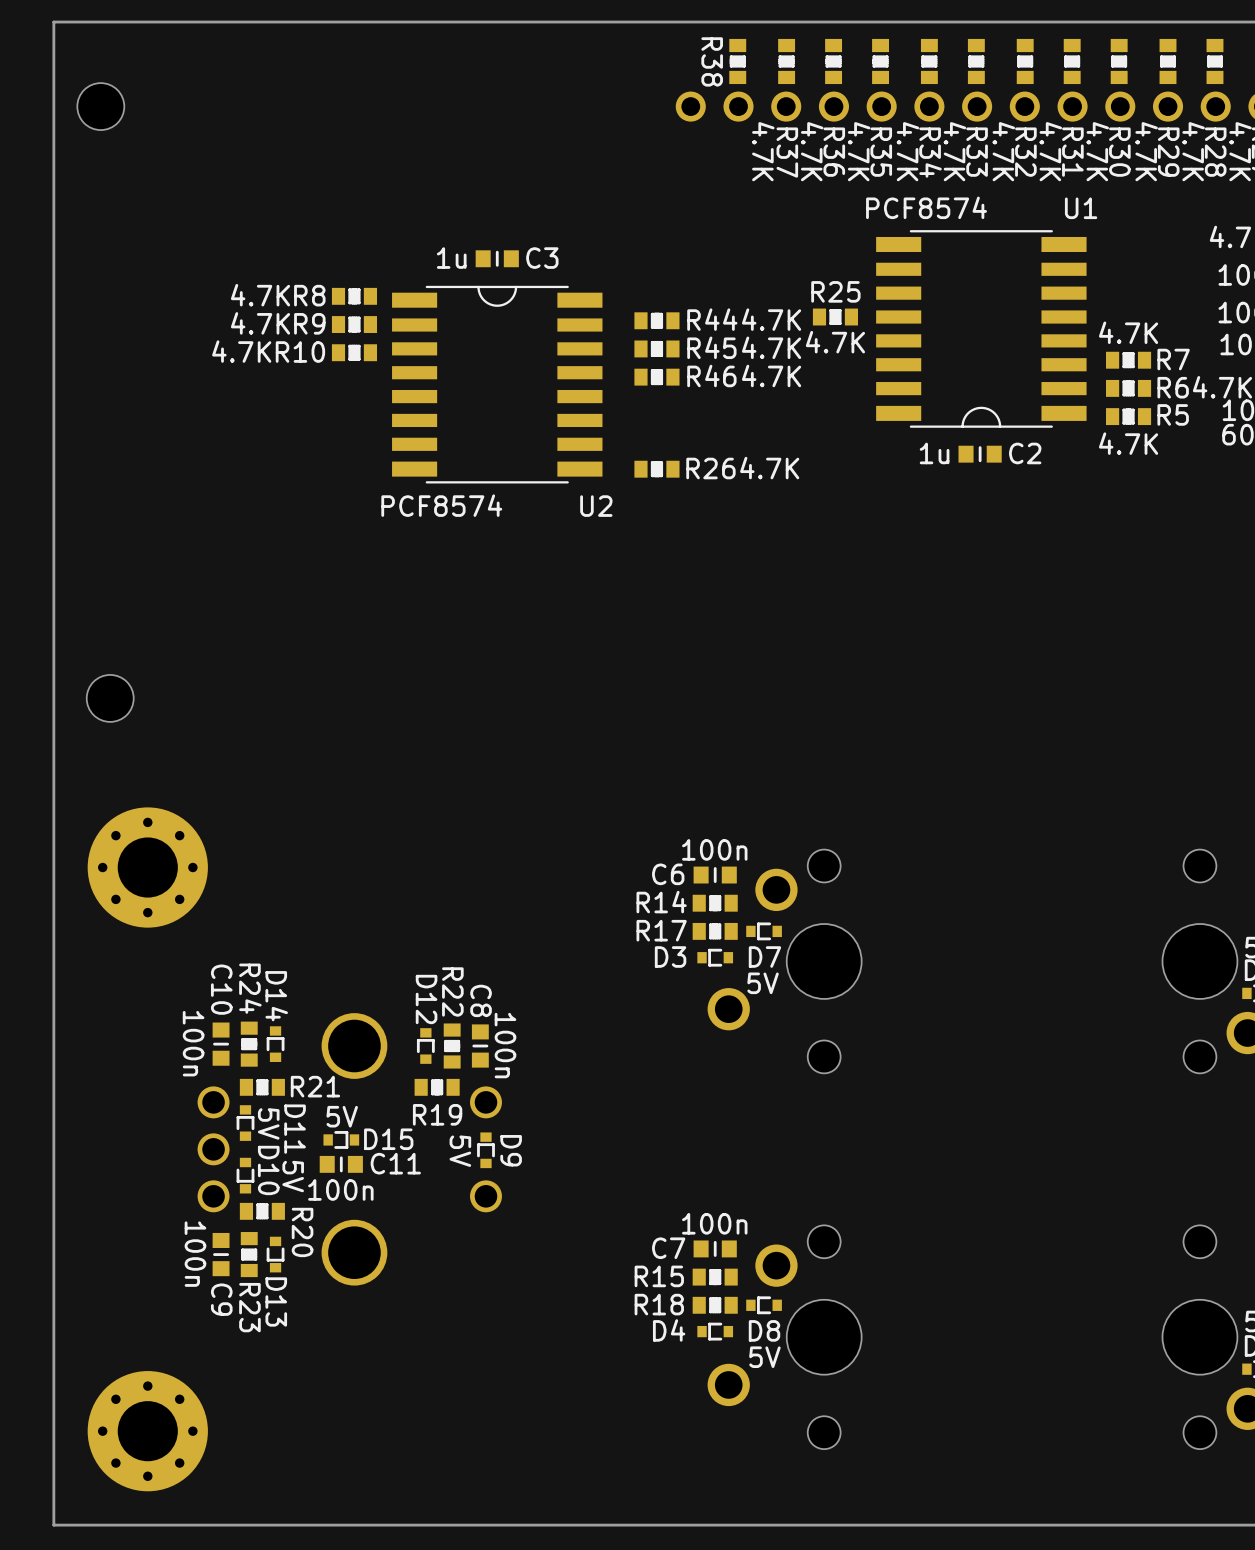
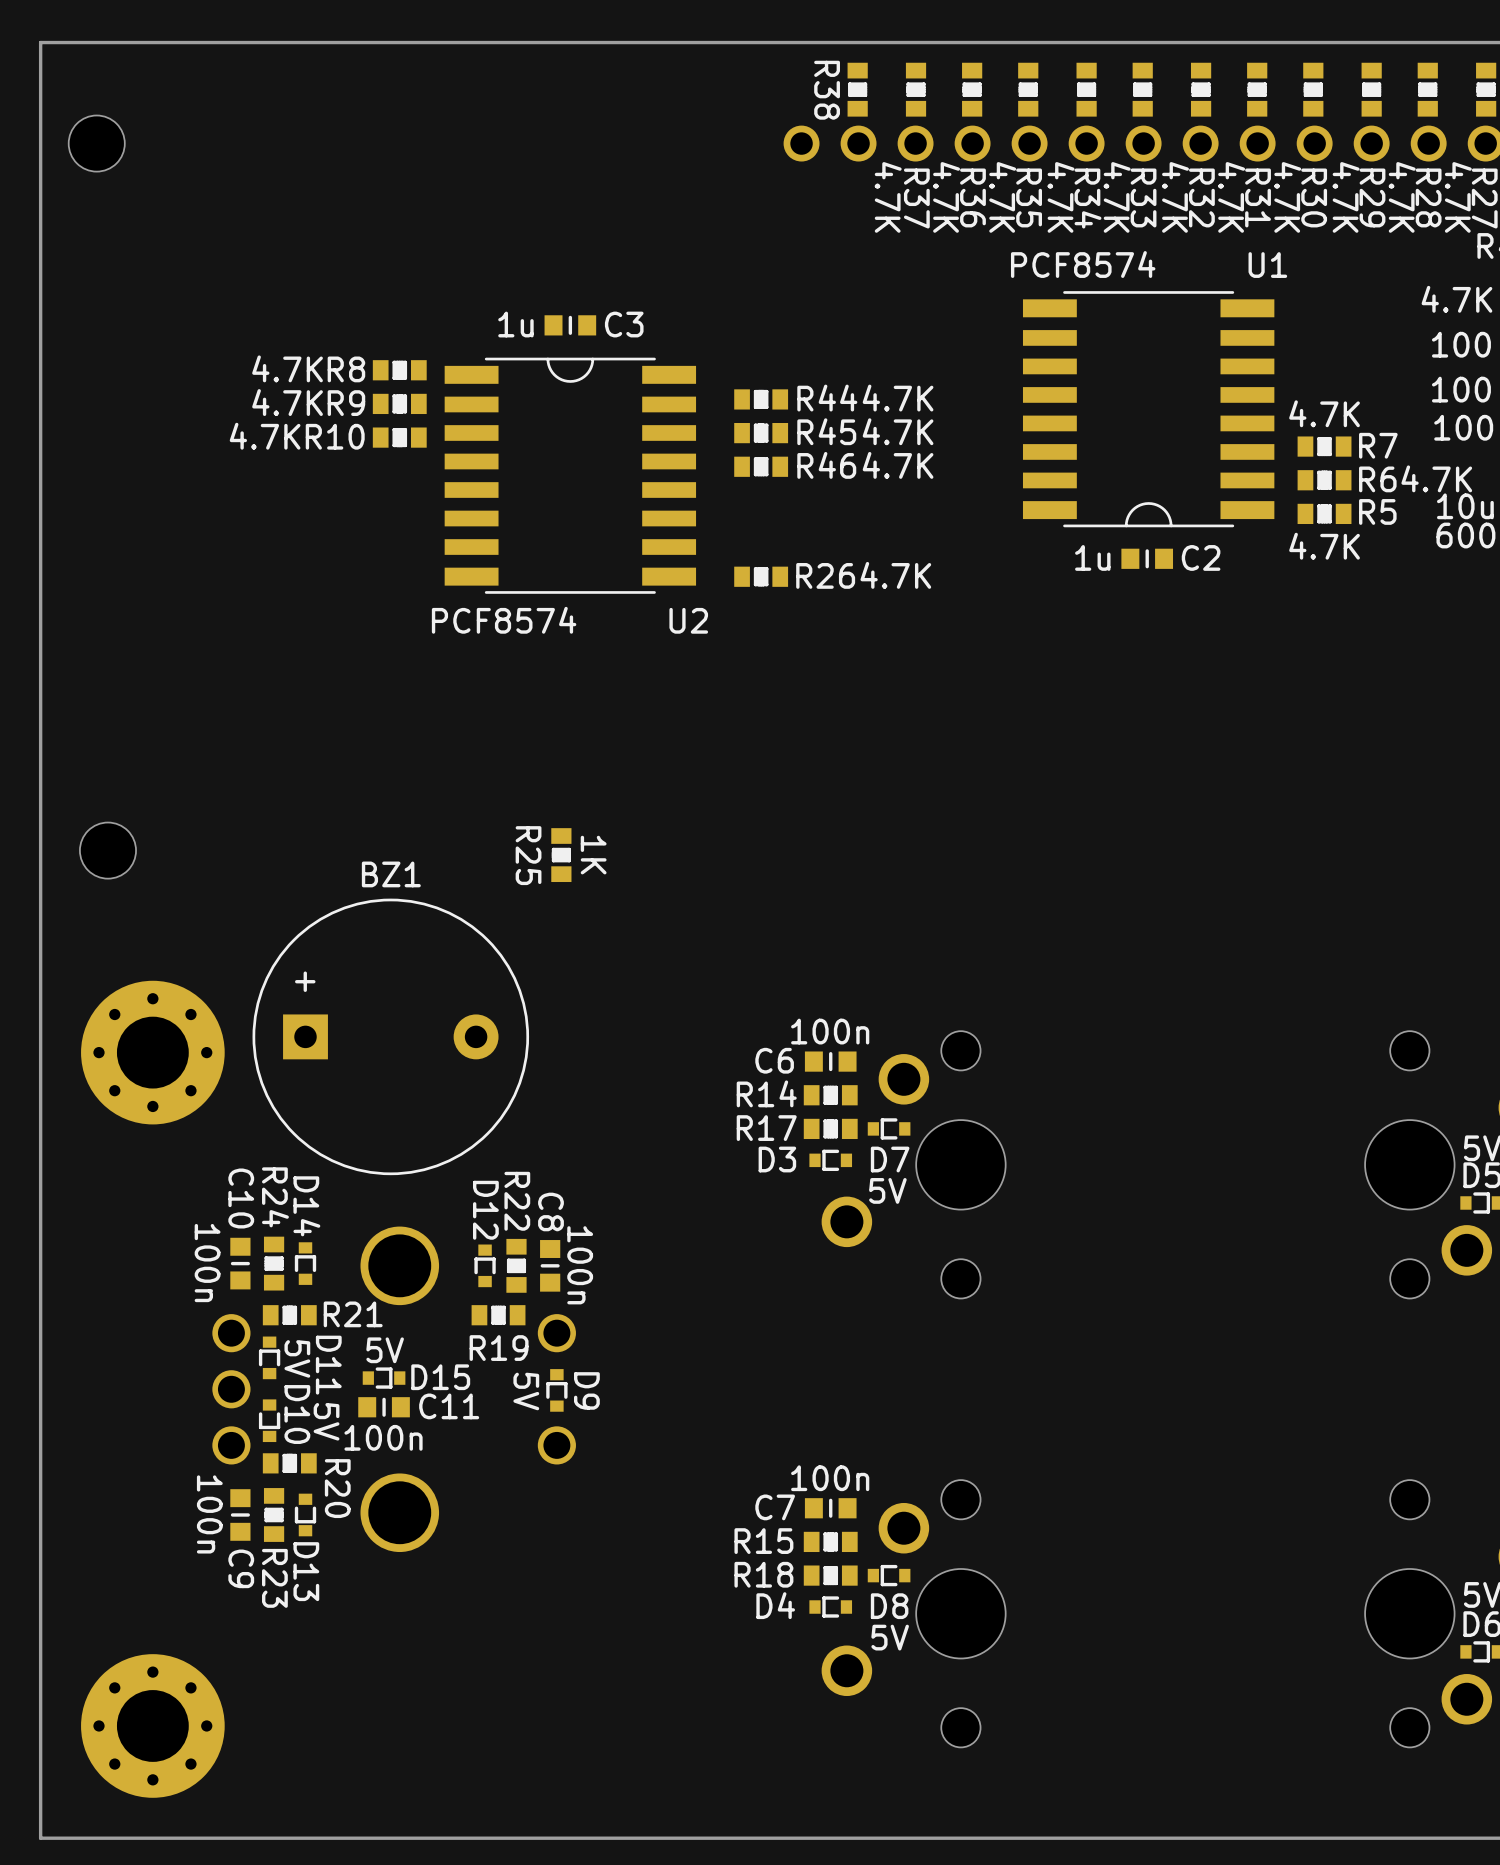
R25 rotation: 0° (835, 317) -> 90° clockwise (561, 855)
R25 position: (835, 317) -> (561, 855)
R25 value: 4.7K (835, 342) -> 1K (593, 855)
BZ1: none -> (390, 1036)

